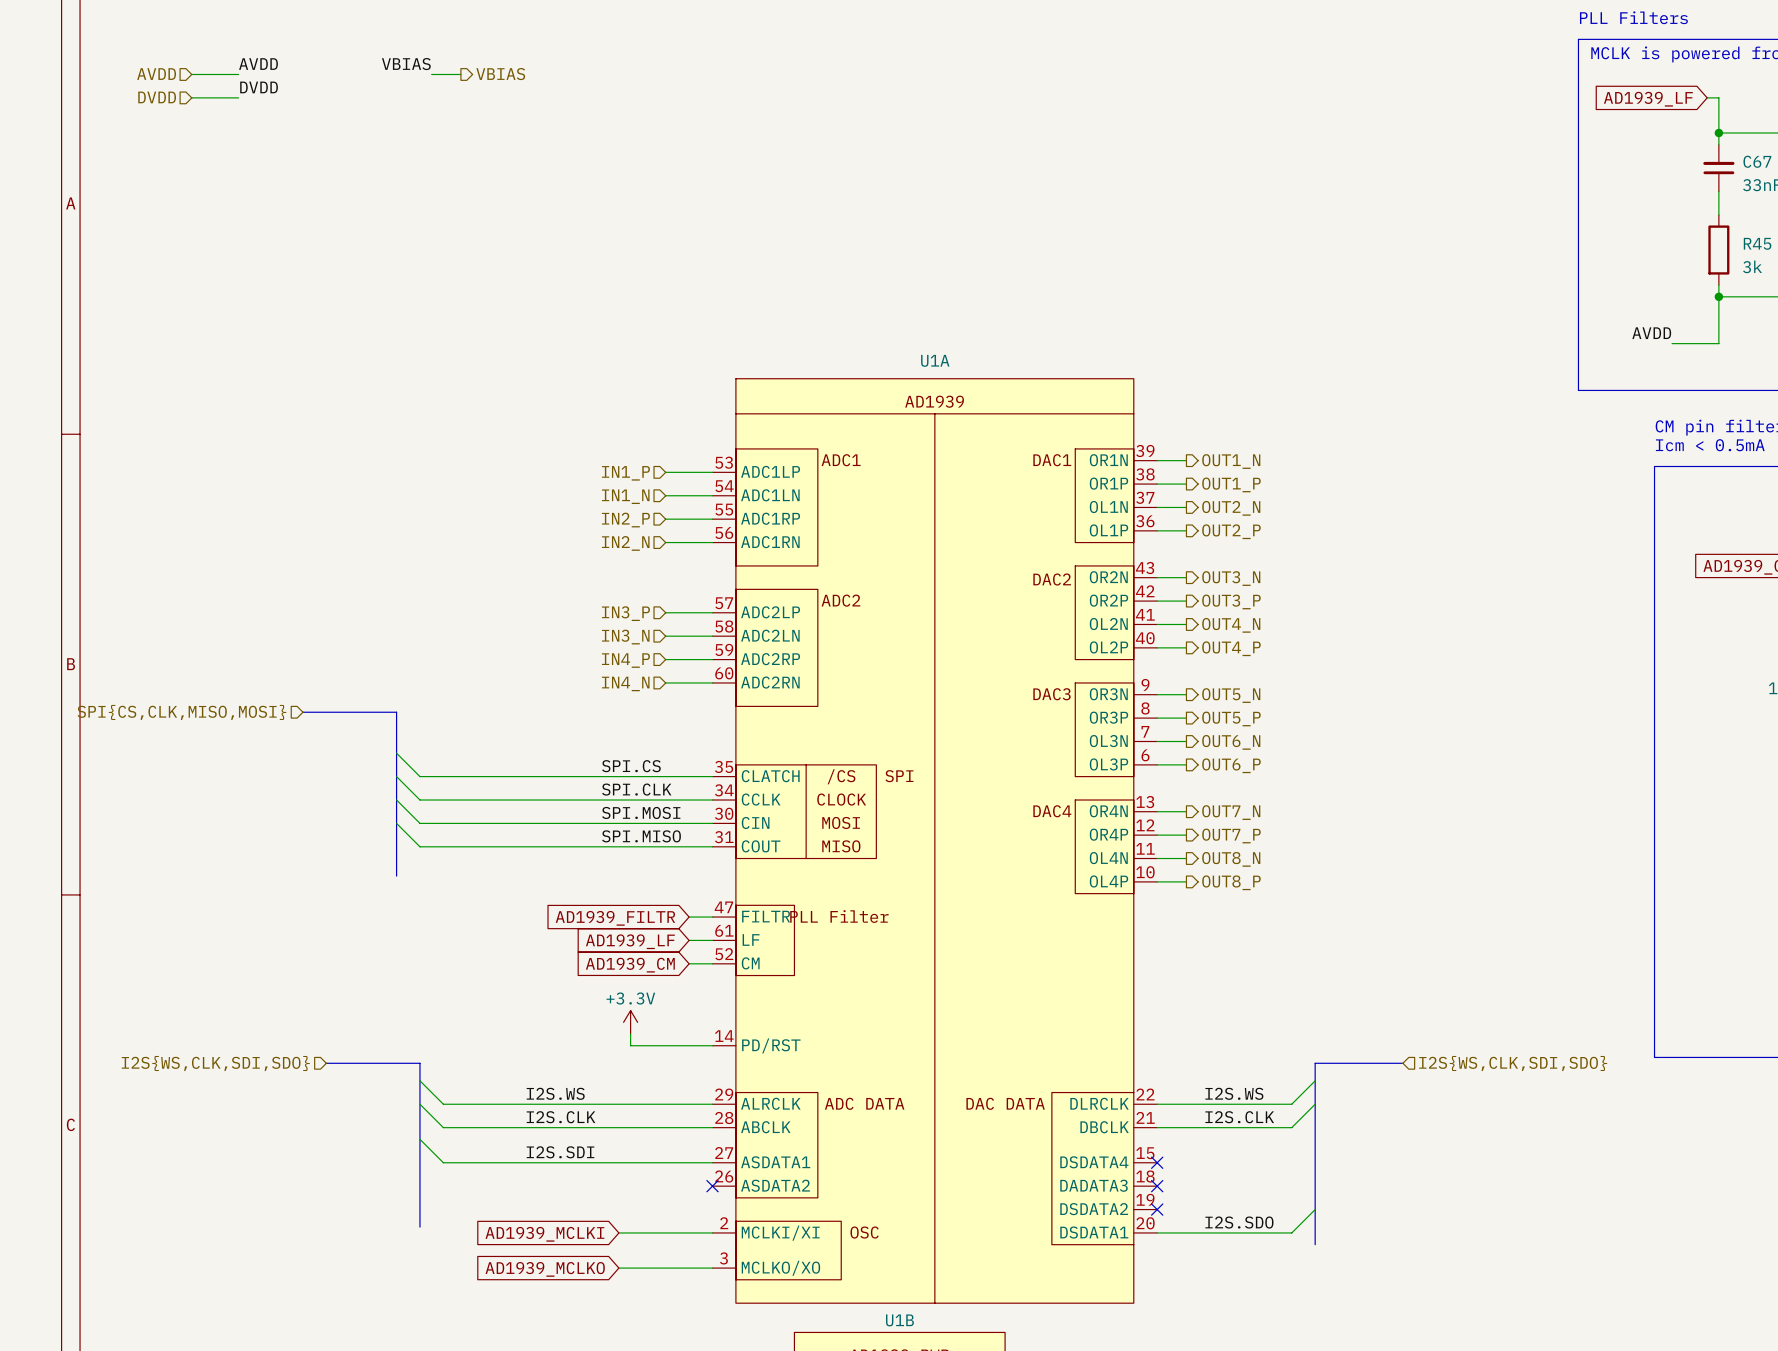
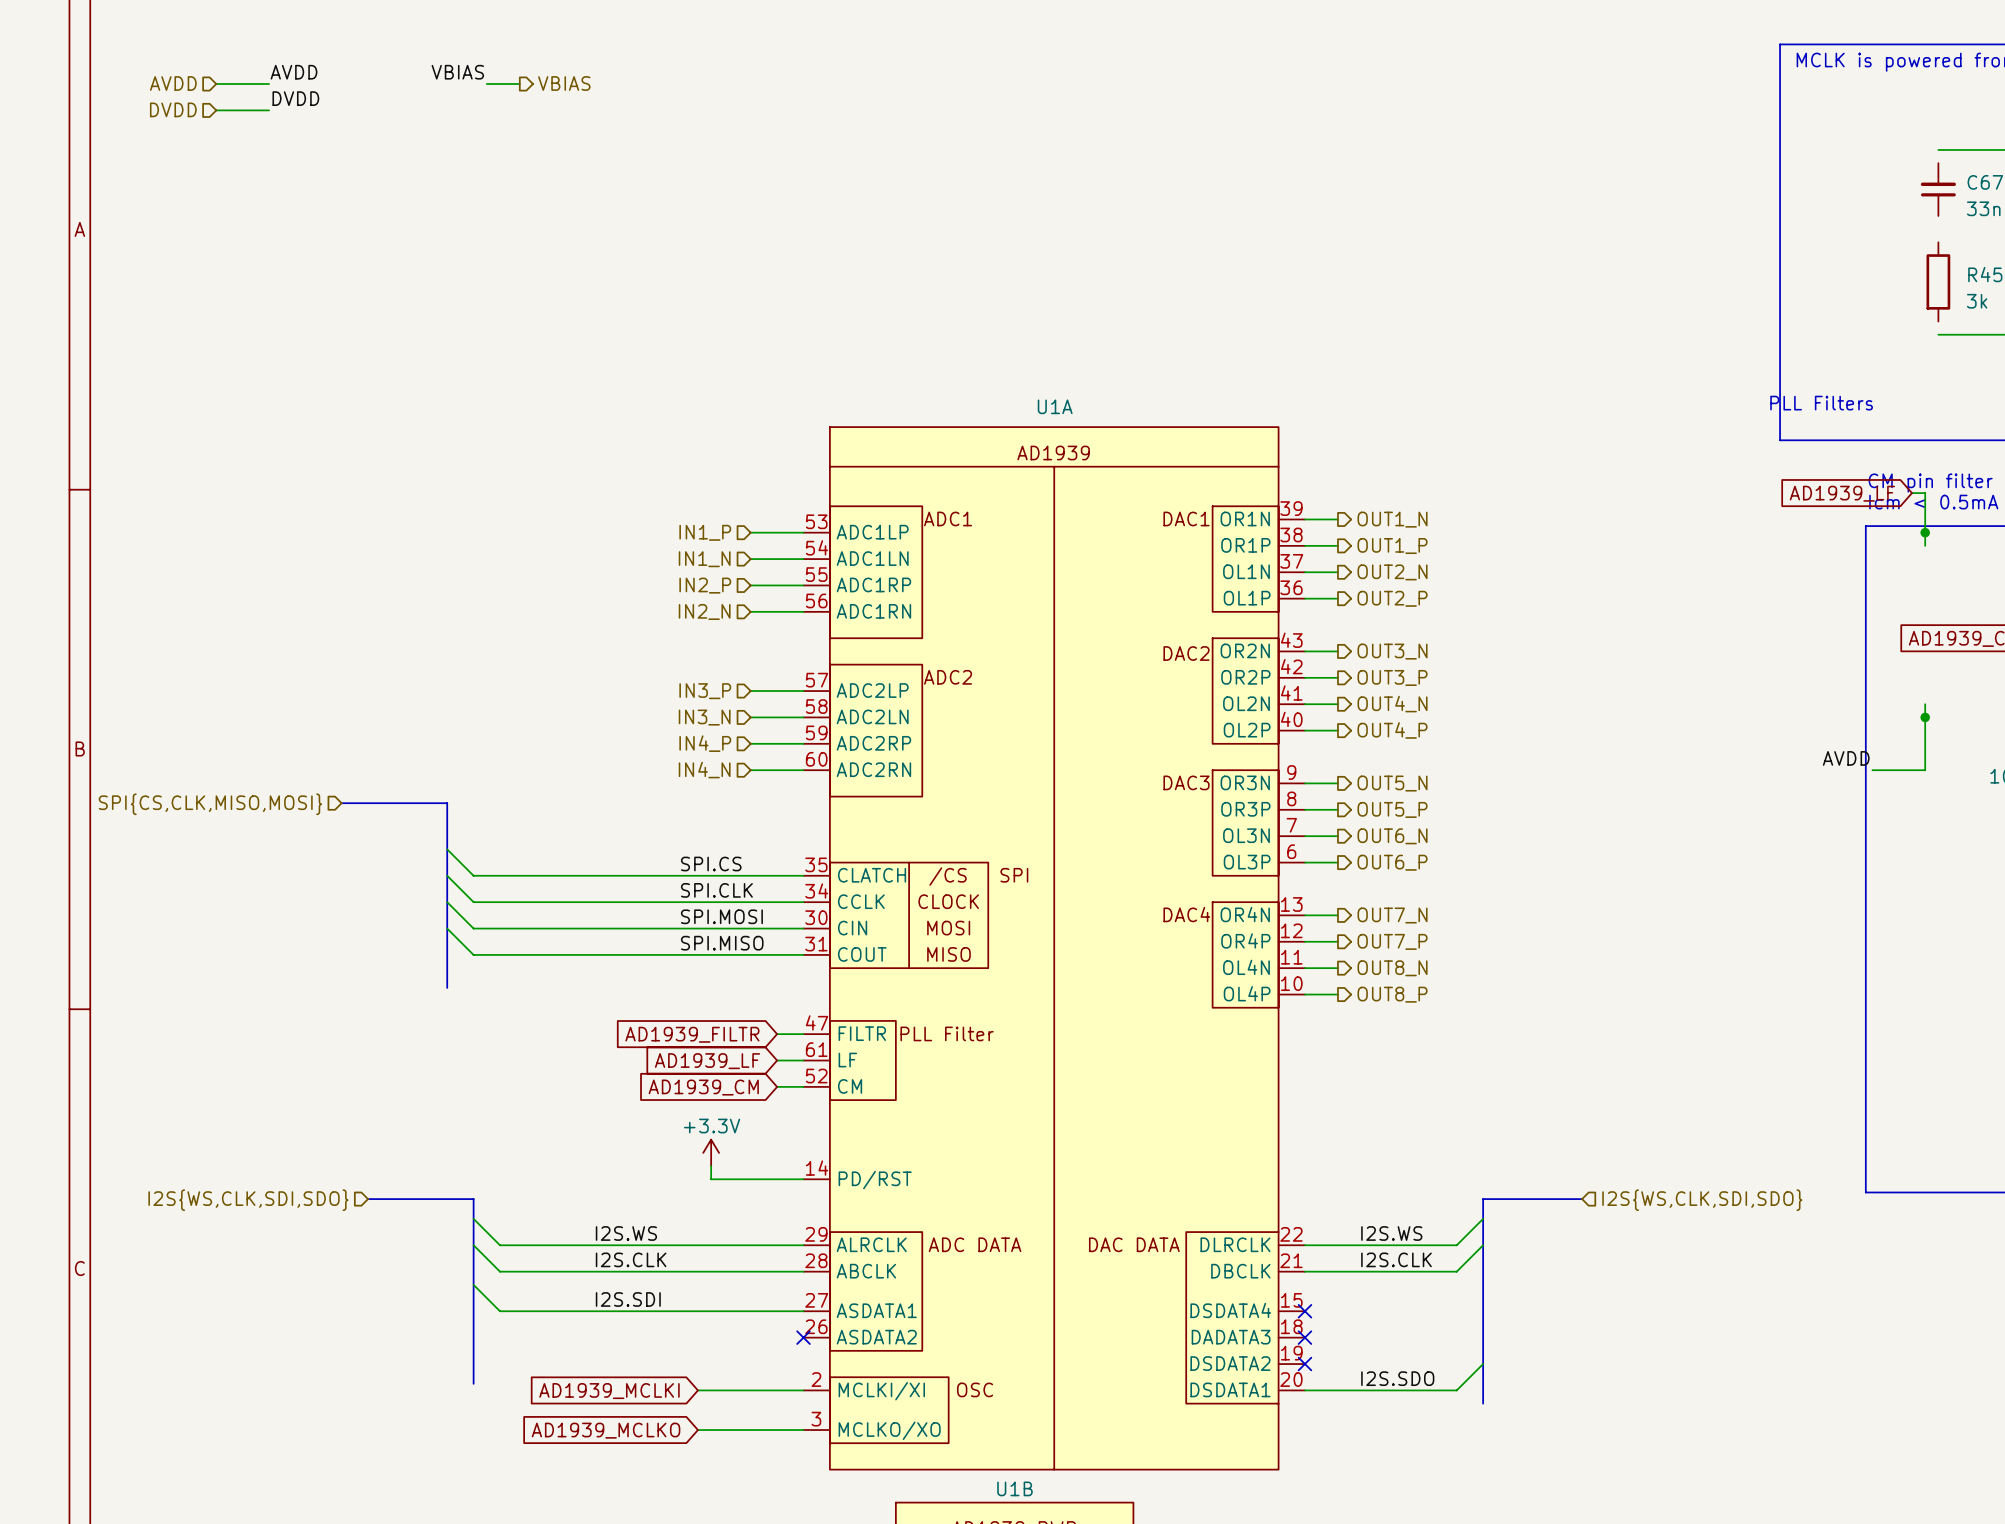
text: PLL Filters (1633, 17) -> none
wire: (1707, 97) (1718, 97) (1718, 144) -> none
global label: AD1939_LF (1648, 99) -> none
junction: (1718, 133) -> none
wire: (1718, 191) (1718, 214) -> none
wire: (1718, 285) (1718, 343) (1672, 343) -> none
junction: (1718, 296) -> none
label: AVDD (1651, 333) -> none
text: none -> PLL Filters (1821, 403)
wire: none -> (1912, 493) (1925, 493) (1925, 545)
global label: none -> AD1939_LF (1842, 493)
junction: none -> (1925, 532)
wire: none -> (1925, 704) (1925, 770) (1872, 770)
junction: none -> (1925, 717)
label: none -> AVDD (1846, 758)

